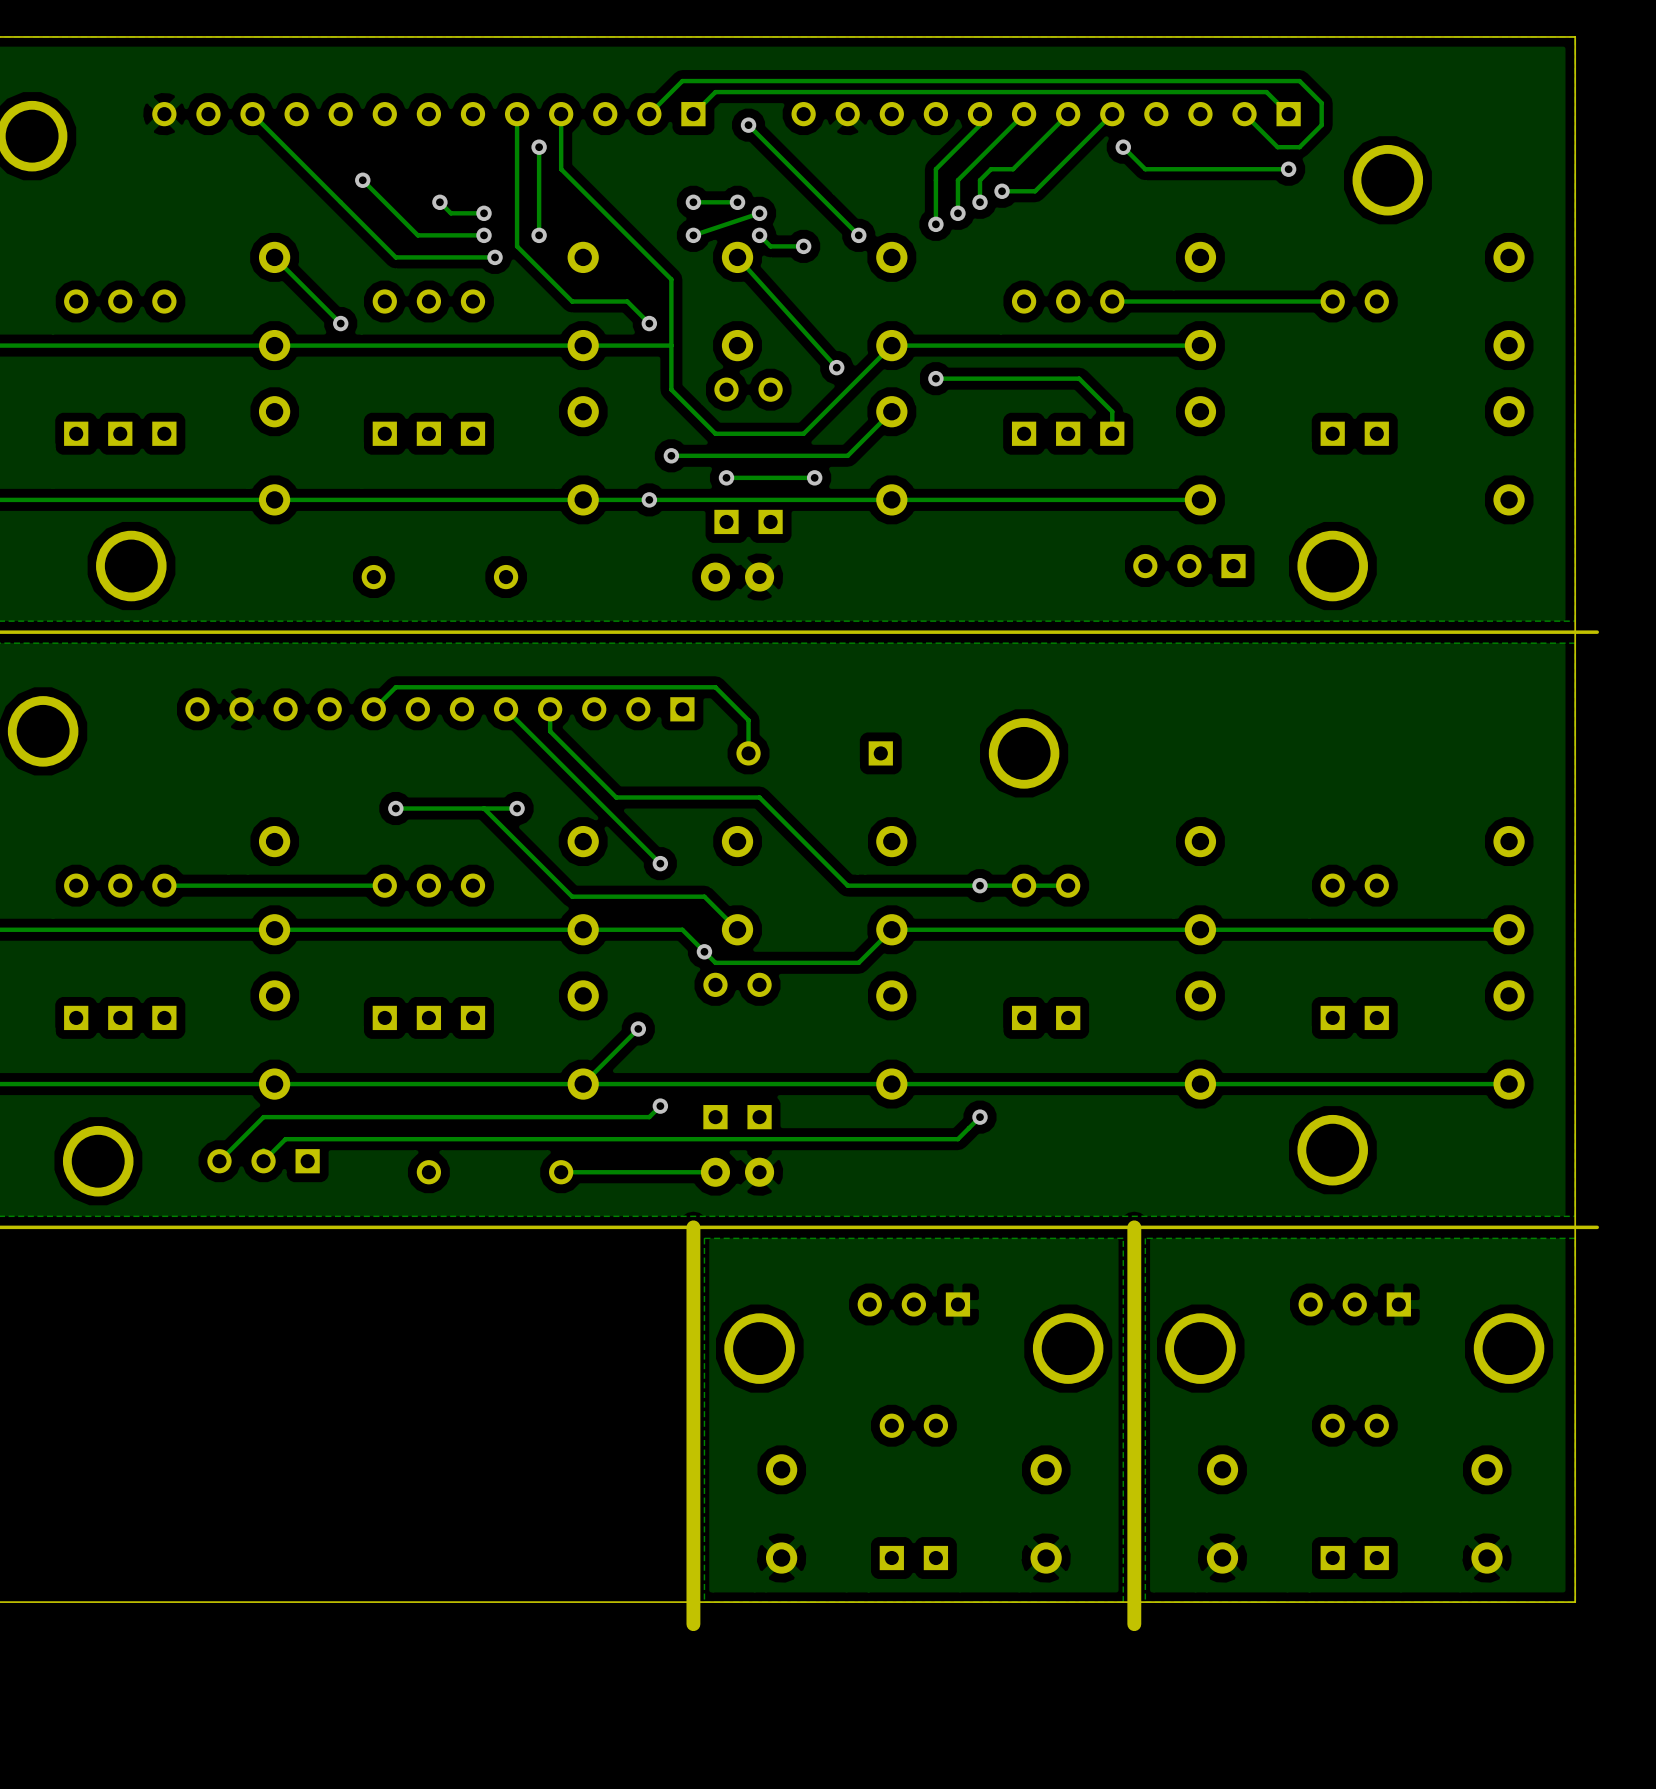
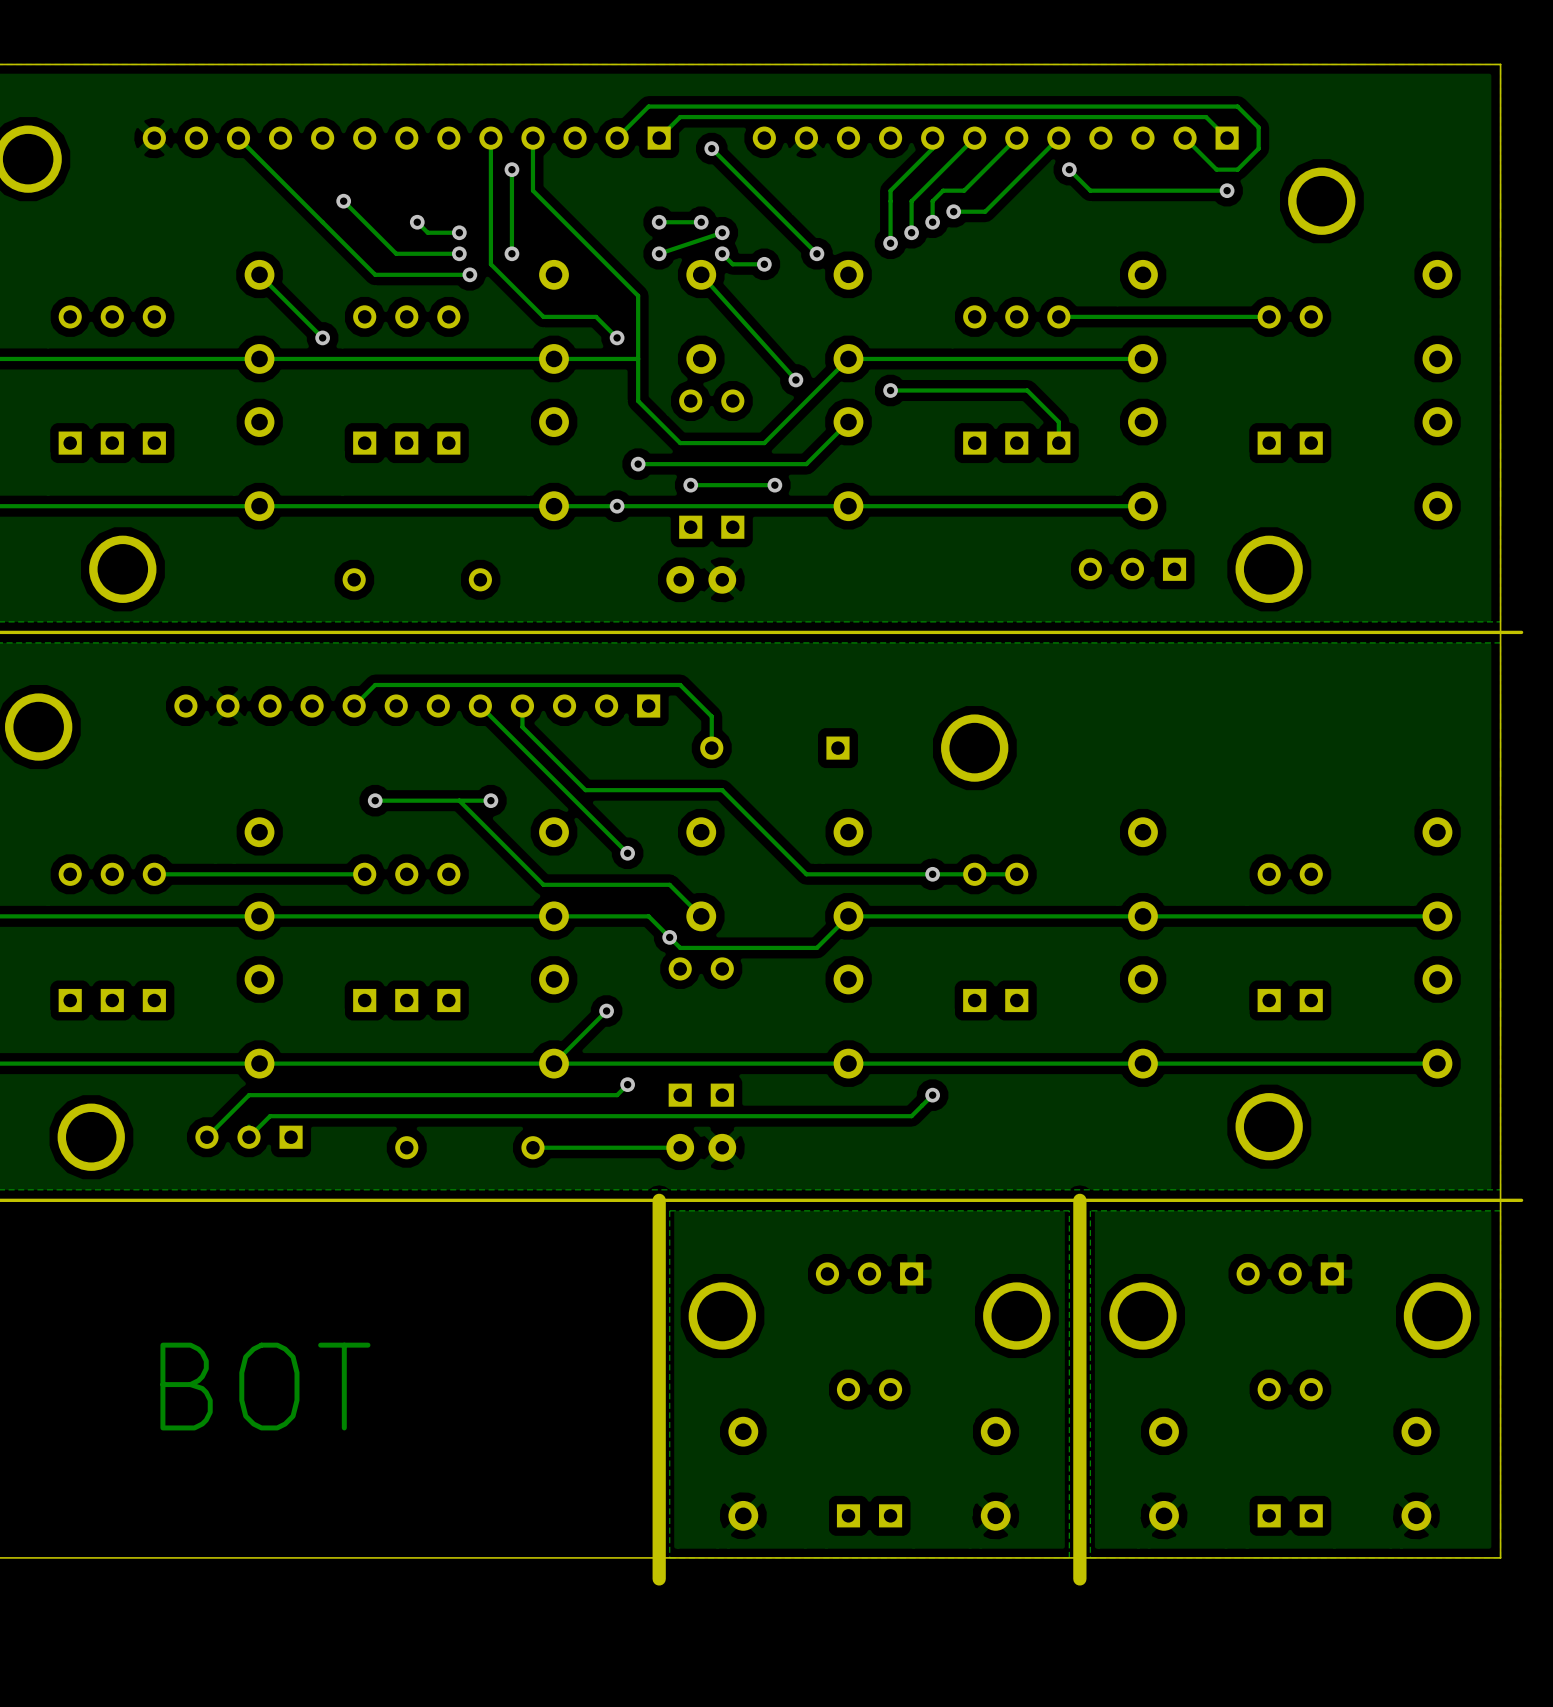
text: none -> BOT (265, 1386)

